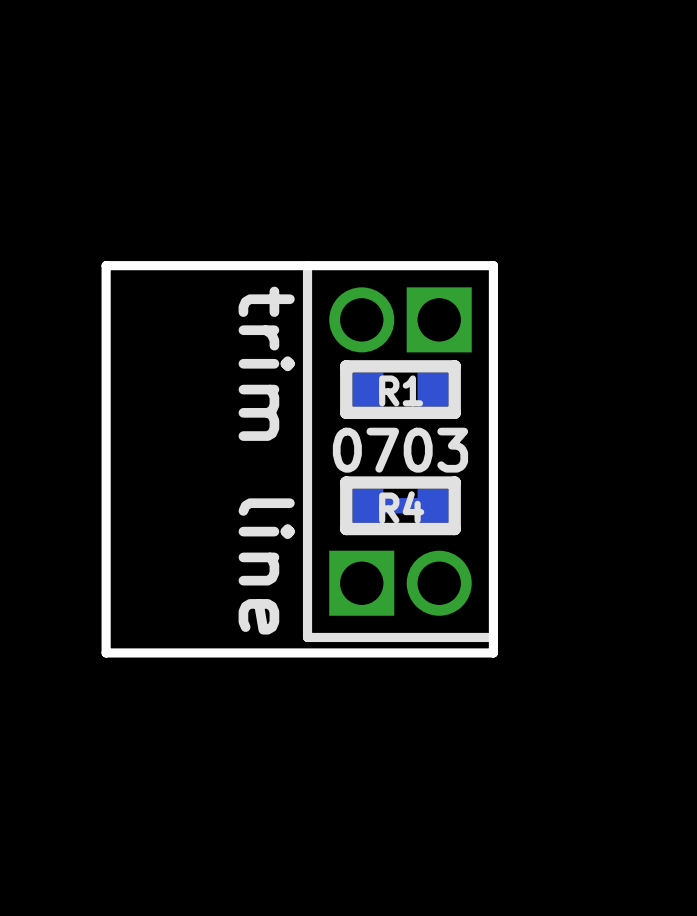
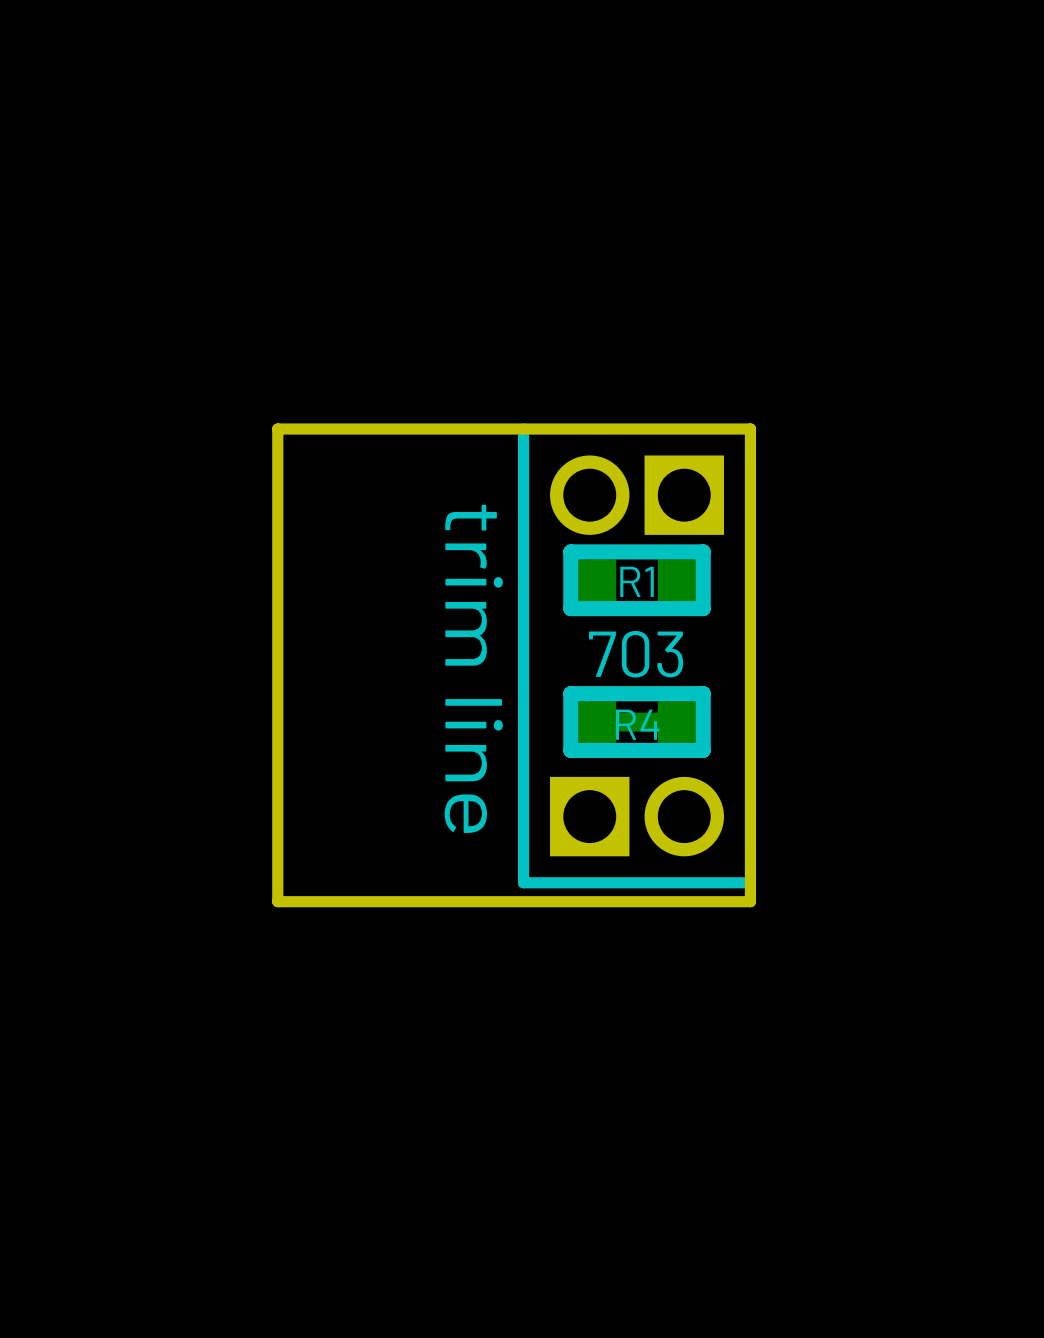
text: 0703 (400, 450) -> 703 (636, 654)

